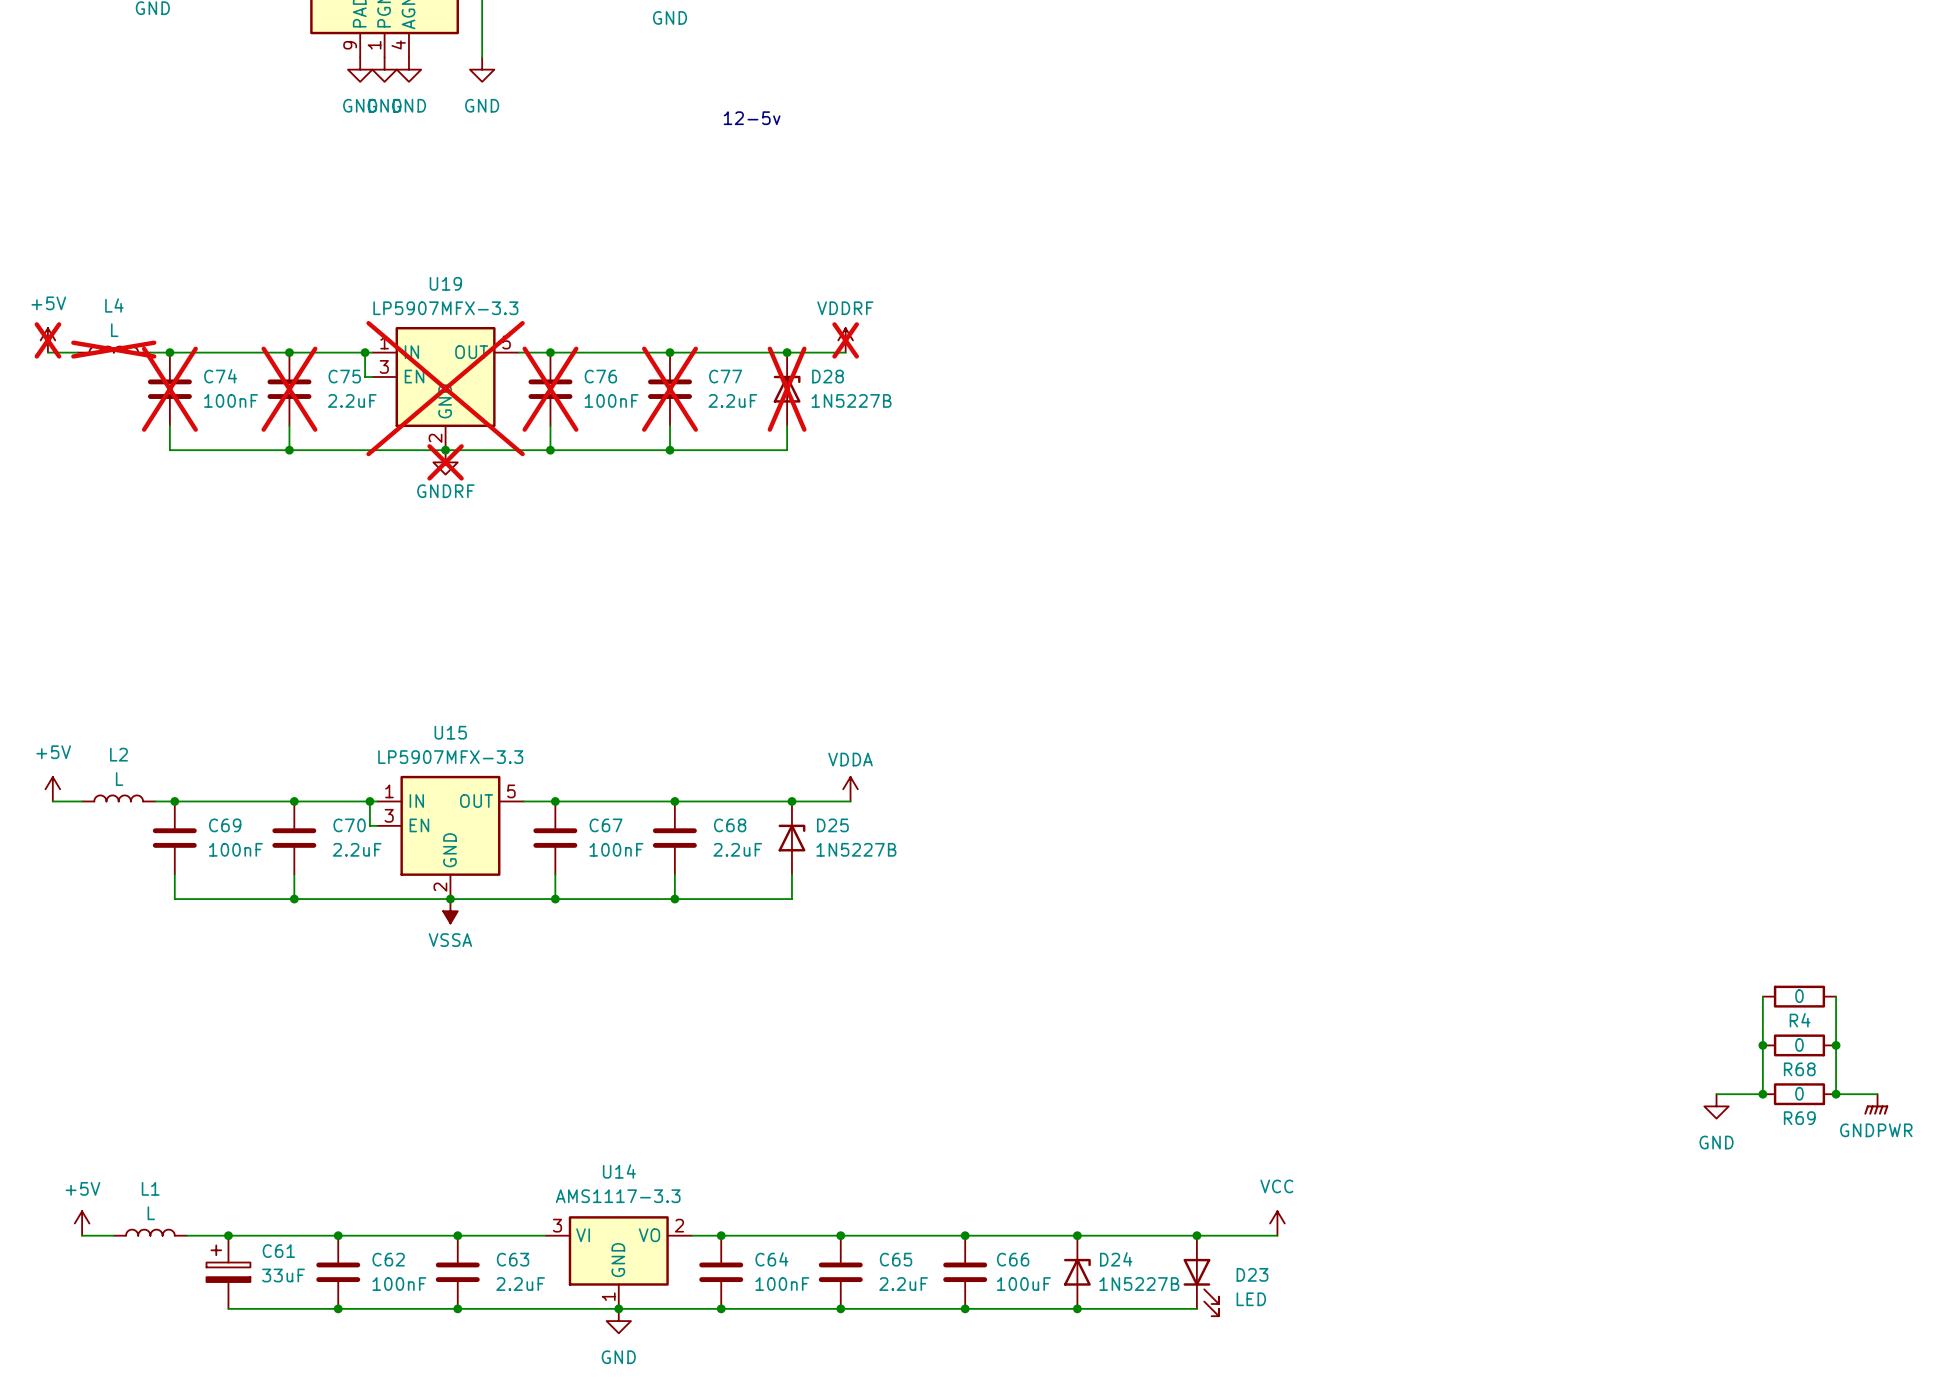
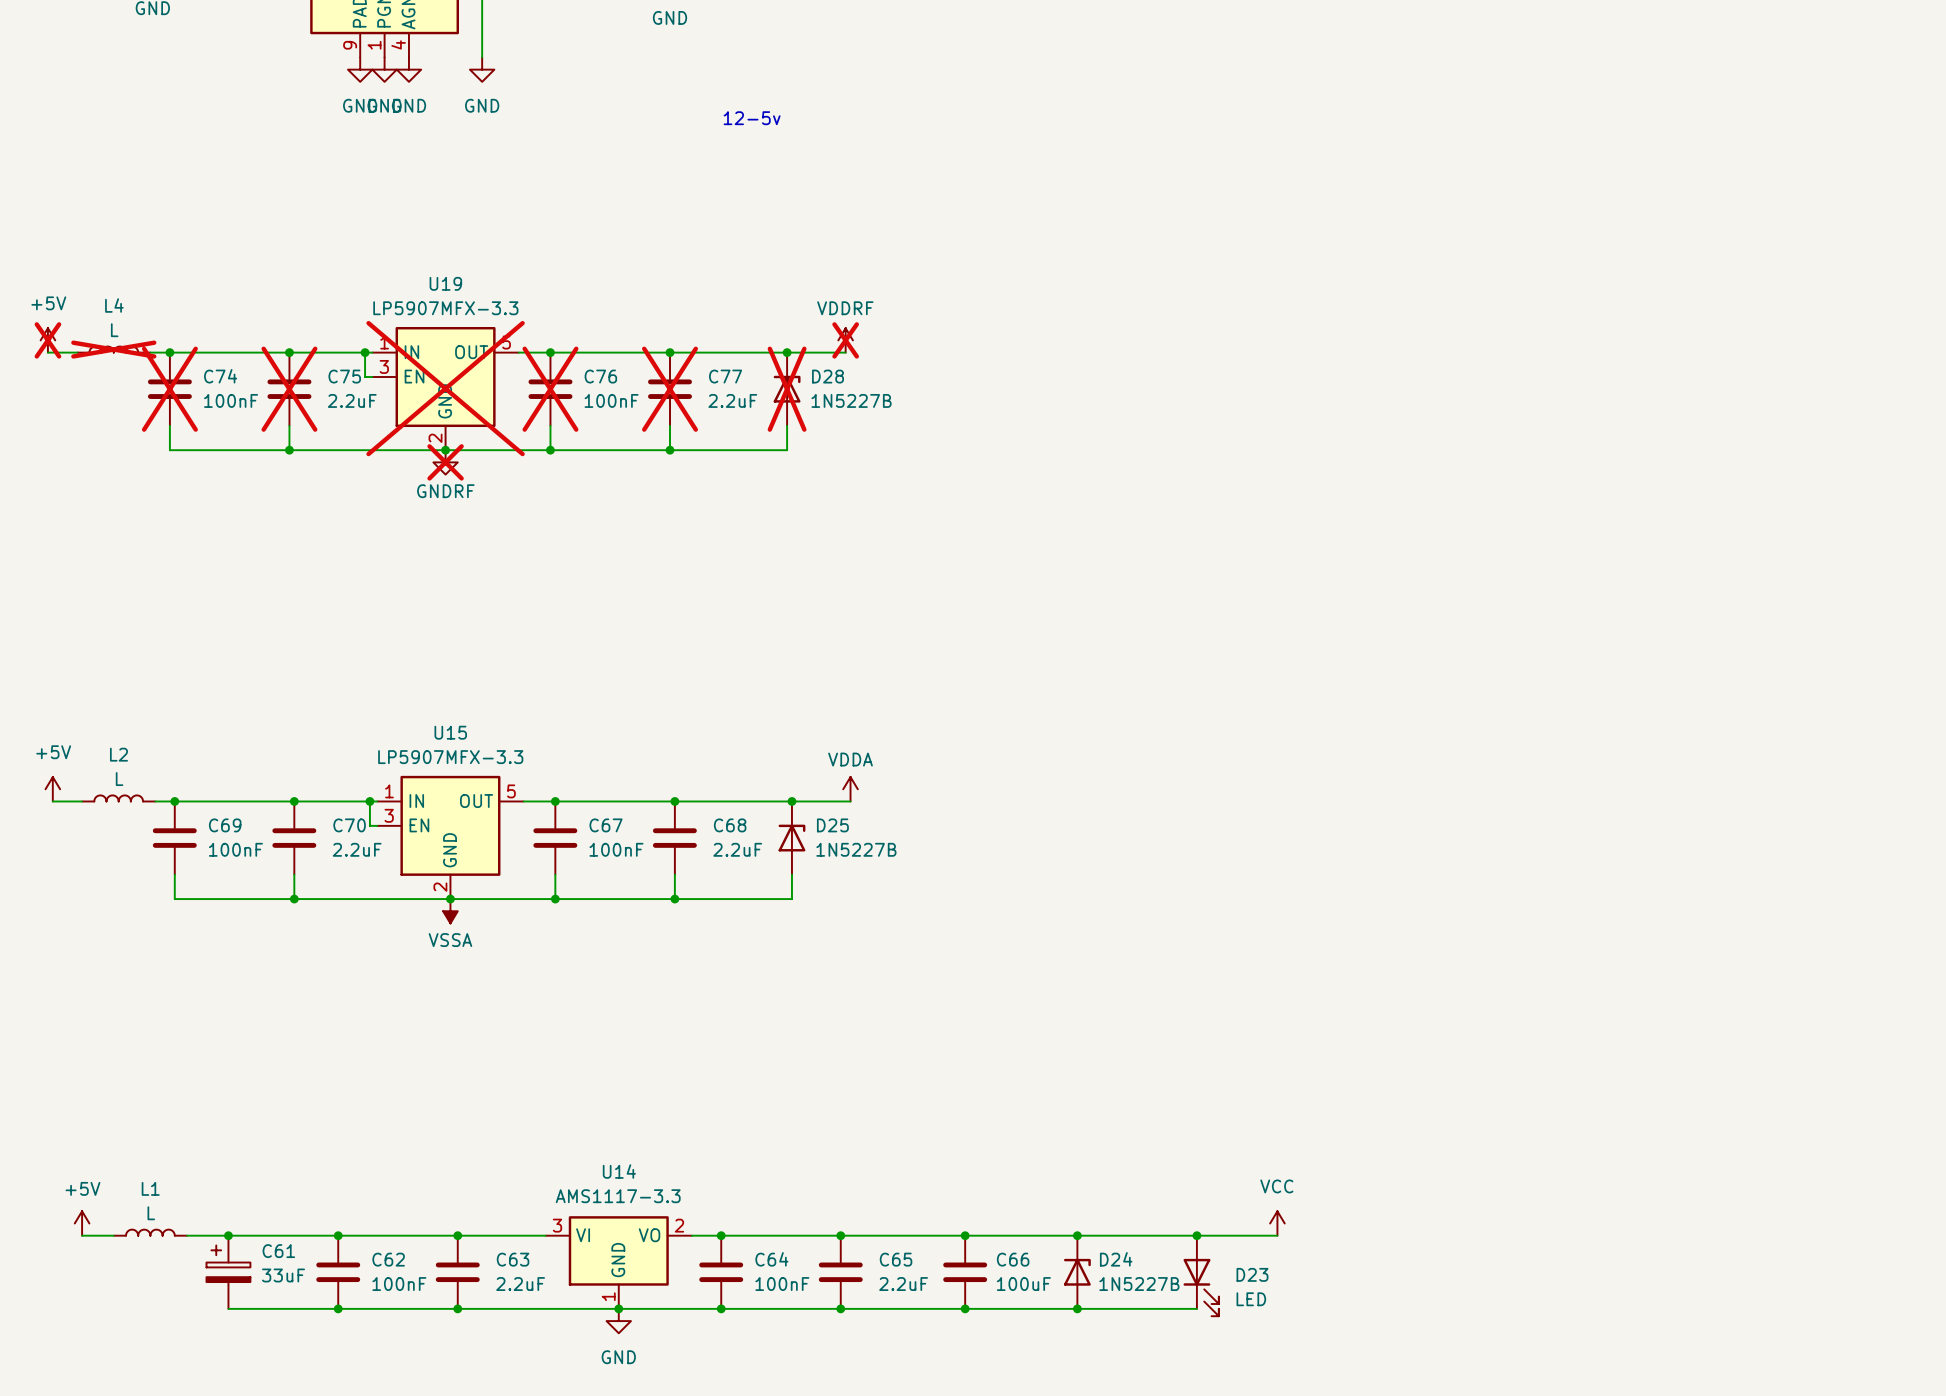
wire: (1762, 996) (1762, 1094) (1716, 1094) -> none
R4: 0 (1799, 996) -> none
wire: (1836, 996) (1836, 1094) (1877, 1094) -> none
junction: (1762, 1045) -> none
R68: 0 (1799, 1045) -> none
junction: (1836, 1045) -> none
junction: (1762, 1094) -> none
R69: 0 (1799, 1094) -> none
junction: (1836, 1094) -> none
power symbol: GNDPWR (1876, 1104) -> none
power symbol: GND (1716, 1106) -> none

